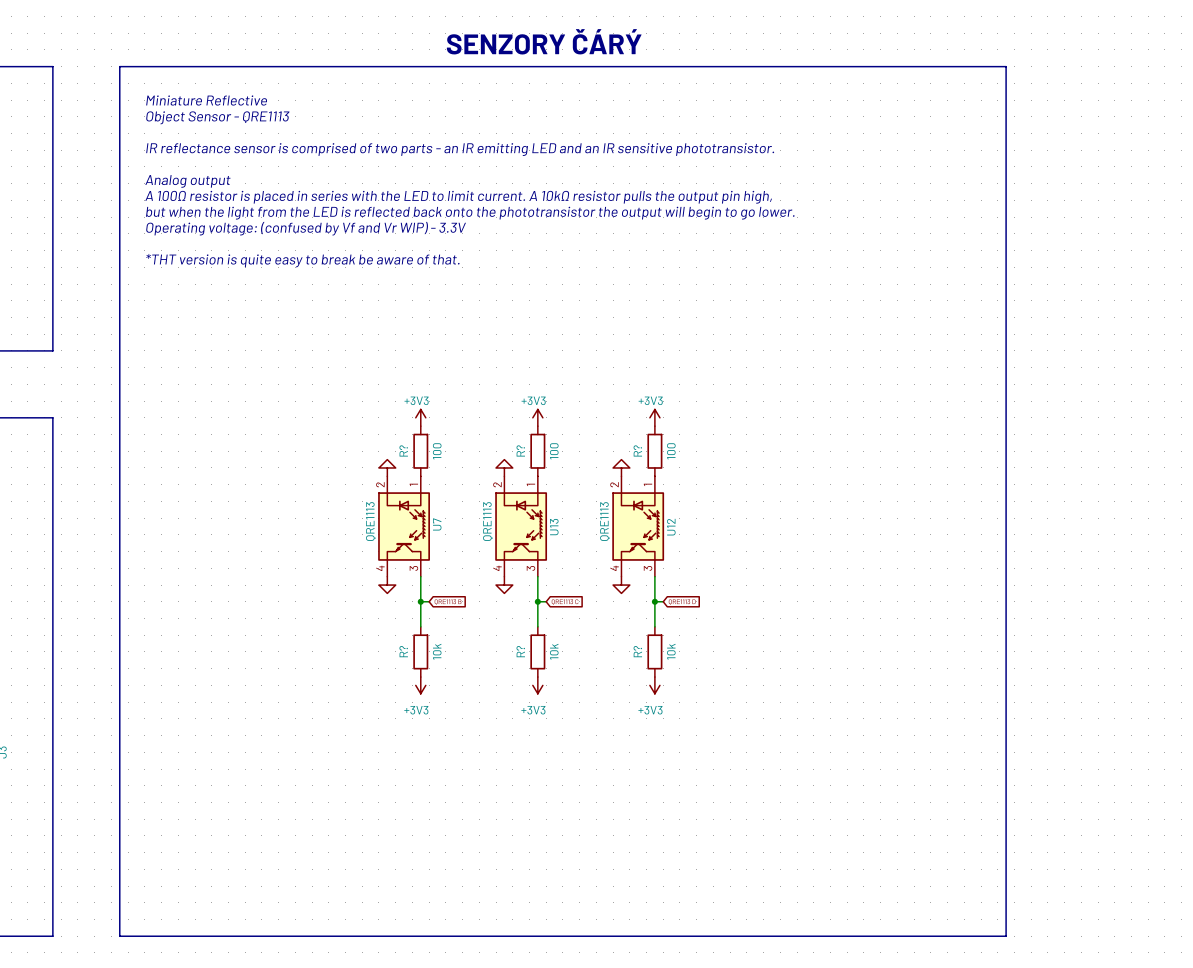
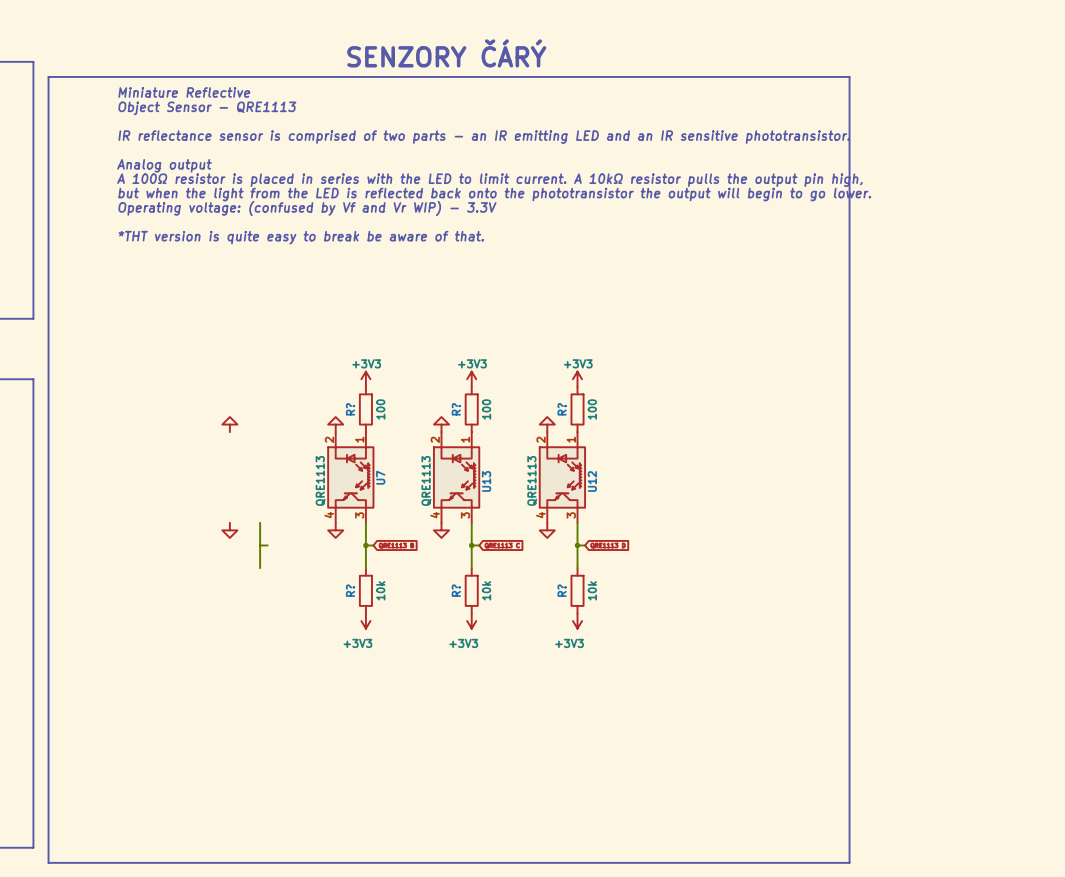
text position: SENZORY ČÁRÝ (544, 41) -> SENZORY ČÁRÝ (446, 53)
line: (119, 66) (1006, 66) (1006, 936) (119, 936) (119, 66) -> (48, 76) (849, 76) (849, 862) (48, 862) (48, 76)
power symbol: none -> (229, 424)
wire: none -> (260, 522) (260, 568)
power symbol: none -> (229, 530)
wire: none -> (260, 545) (267, 545)

